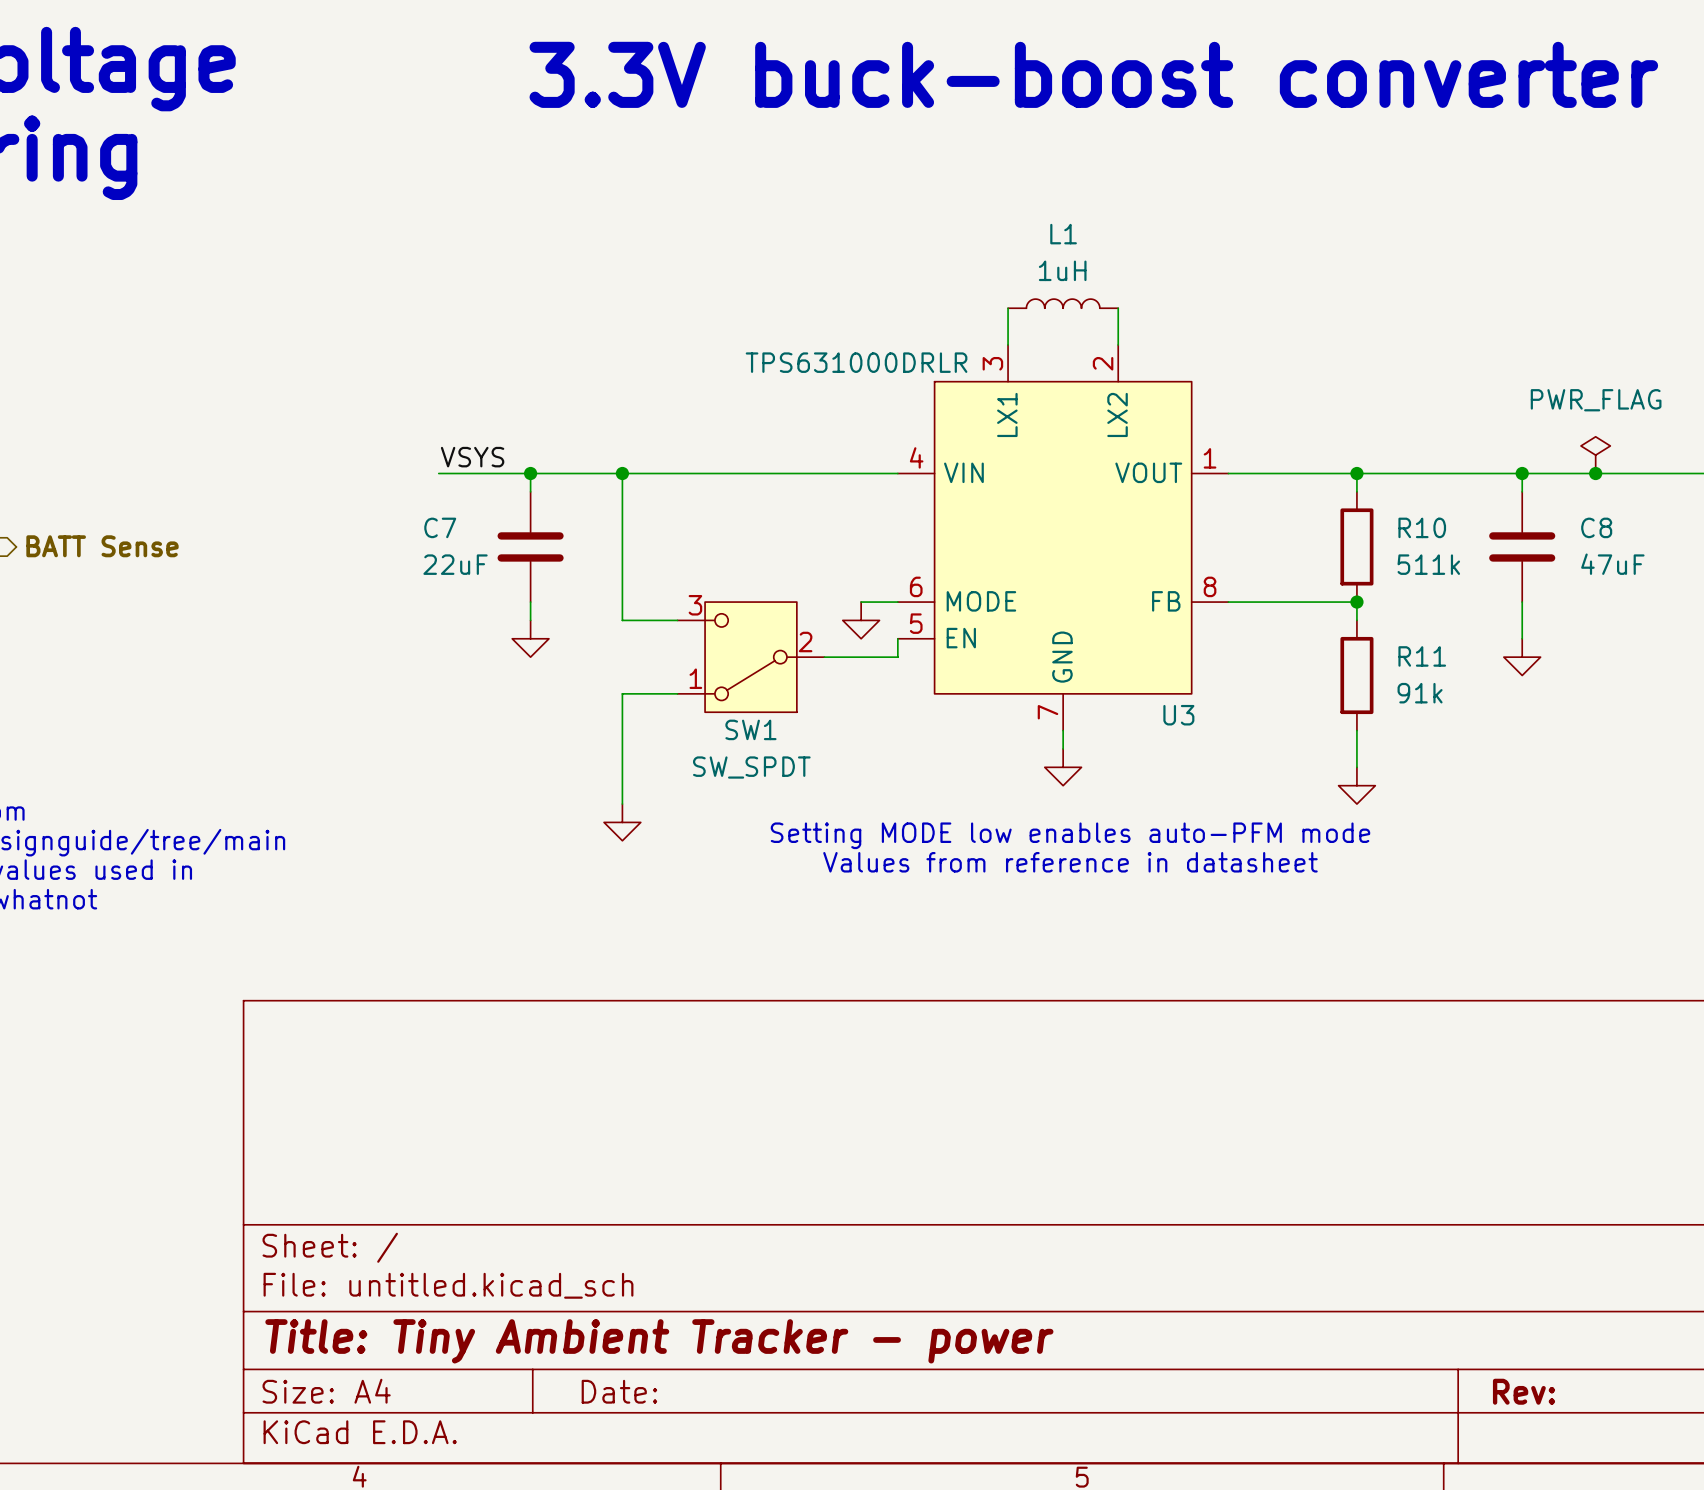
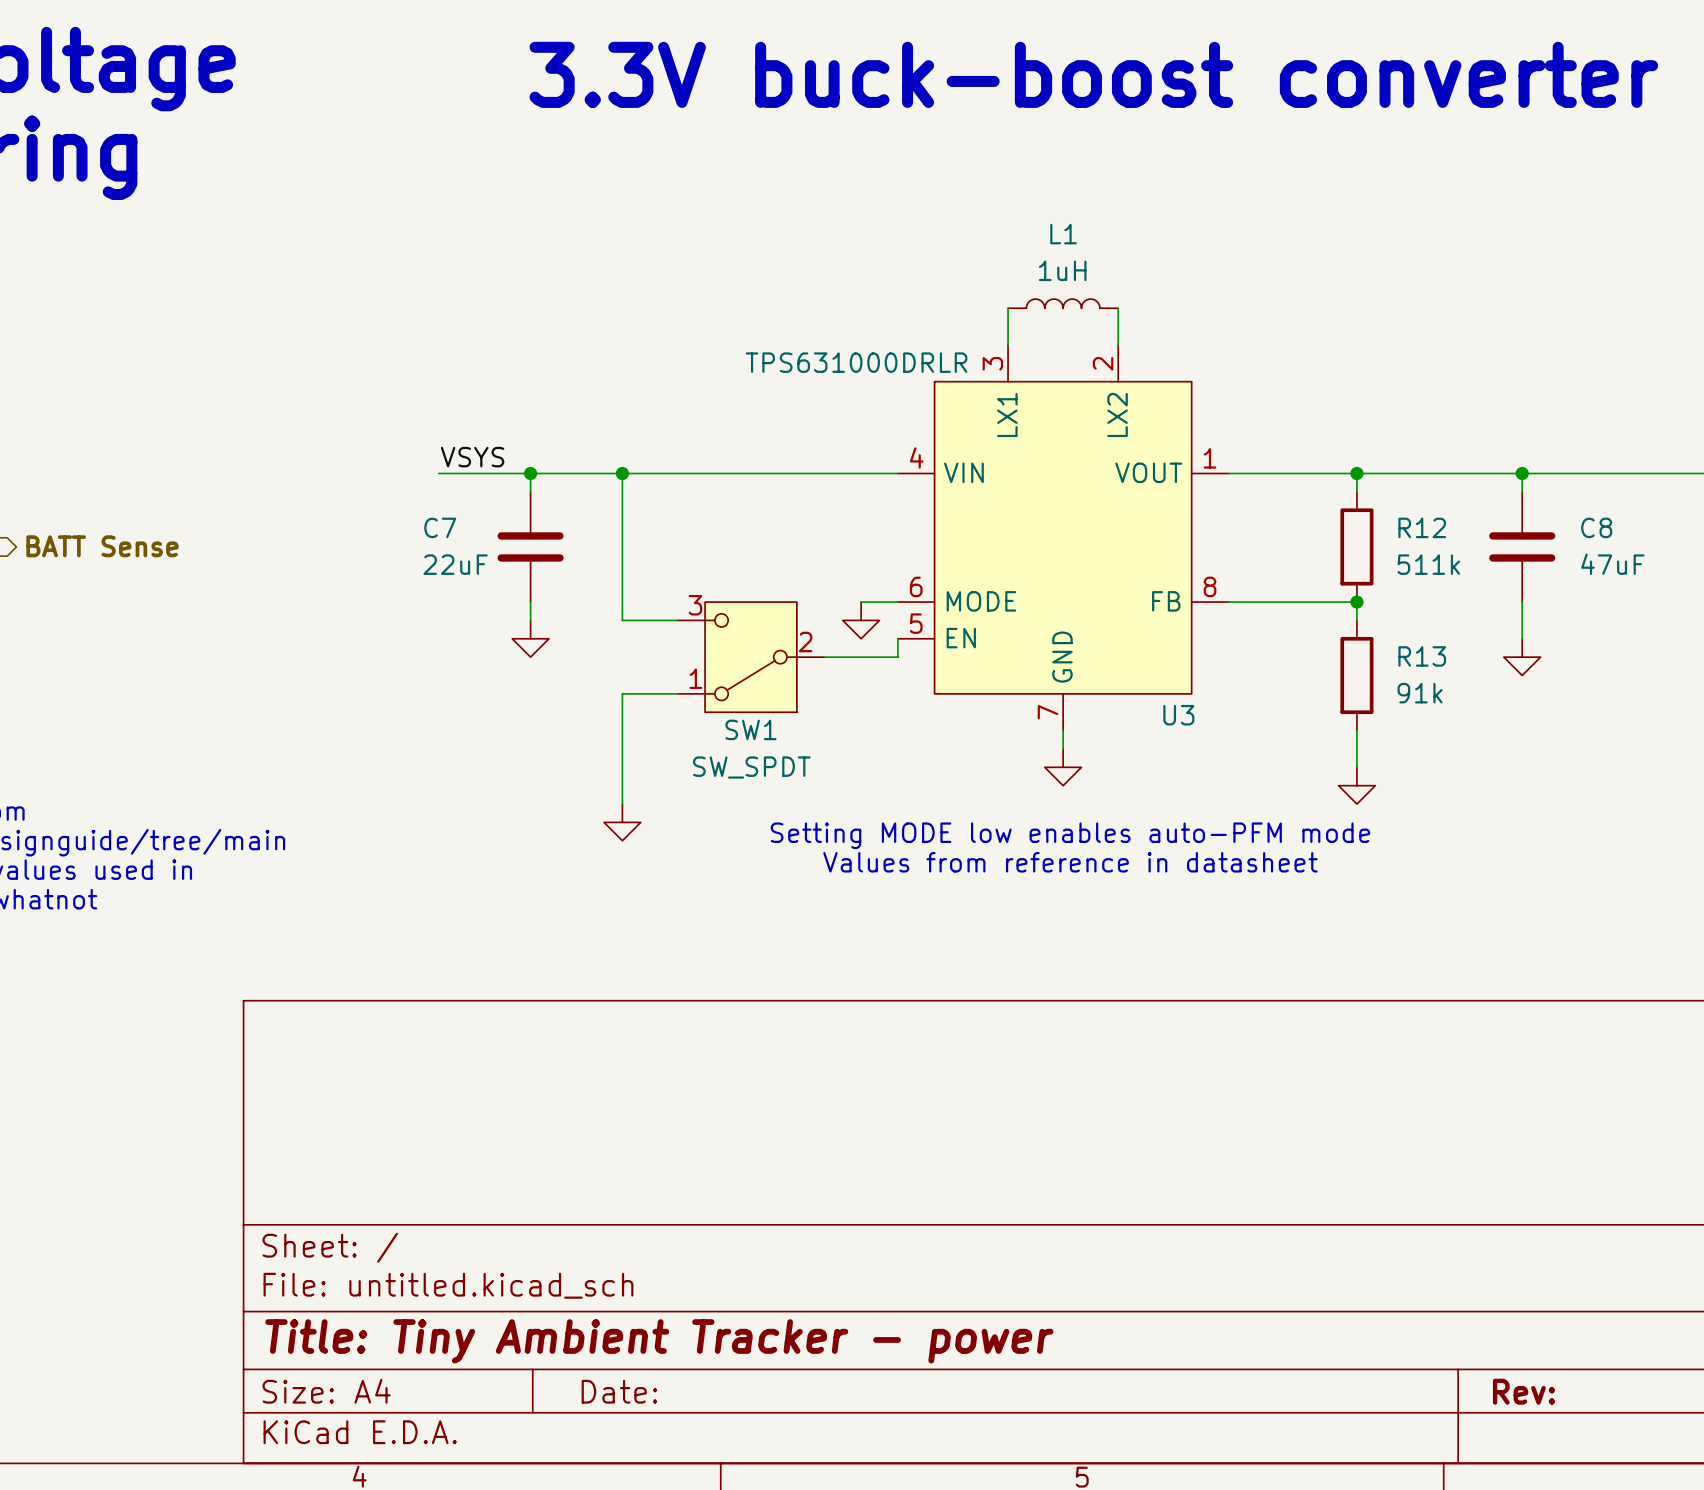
power symbol: PWR_FLAG (1595, 455) -> none
junction: (1595, 473) -> none
R10 name: R10 (1422, 527) -> R12 (1422, 527)
R11 name: R11 (1422, 656) -> R13 (1422, 656)

